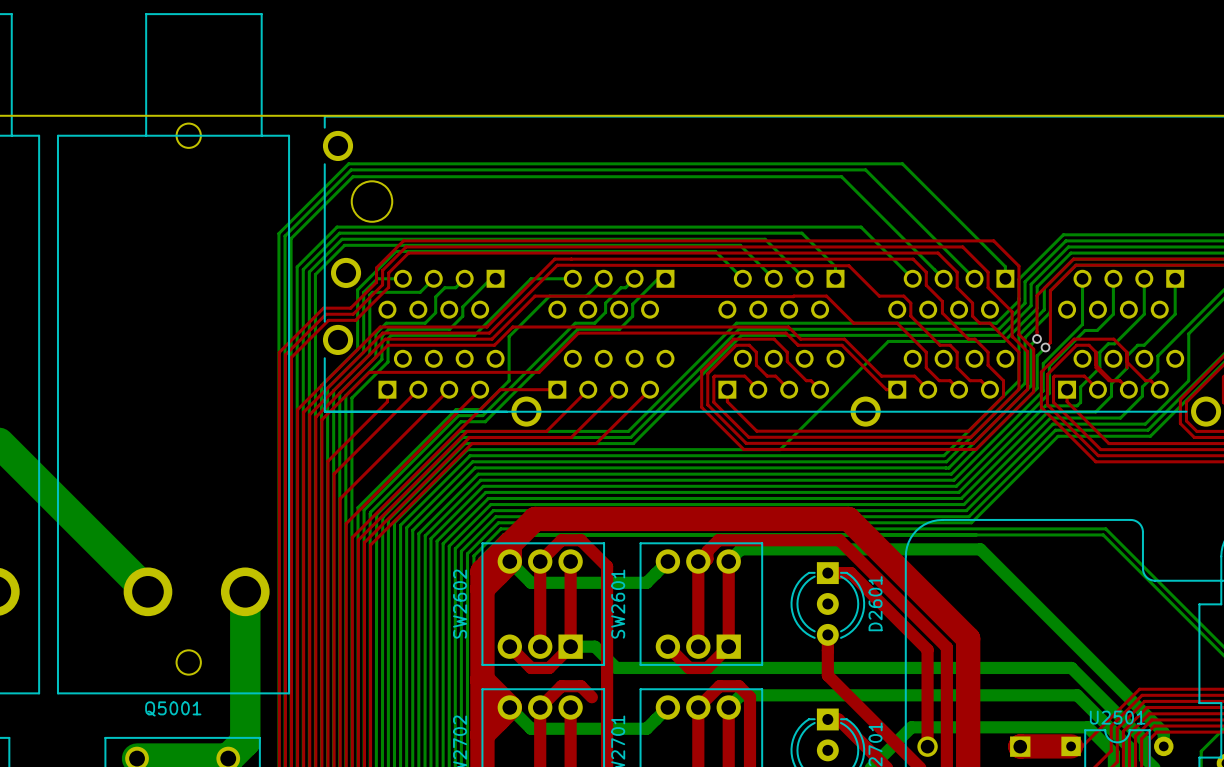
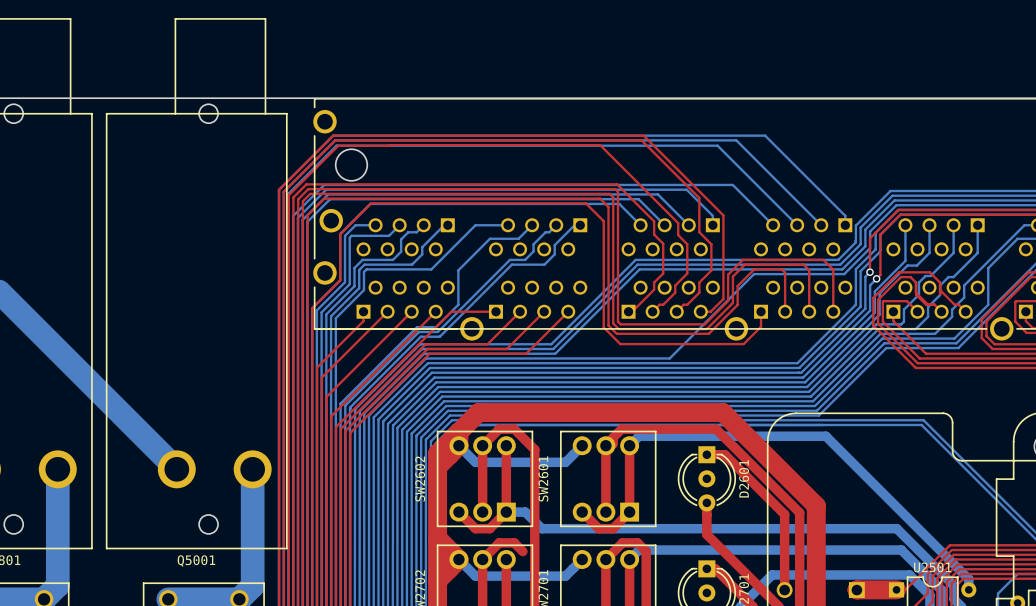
top track: (826, 296) (535, 296) (492, 339) (385, 339) (309, 414) -> (705, 238) (699, 232) (699, 198) (641, 140) (335, 140) (283, 191) (283, 284)
top track: (833, 303) (853, 323) (874, 323) -> (711, 244) (711, 270) (699, 282) (699, 292) (676, 311)
top track: none -> (742, 259) (728, 274) (728, 301) (704, 324) (620, 324)
top track: (897, 323) (926, 352) (926, 367) (939, 380) (950, 380) (959, 389) -> (760, 259) (823, 259) (833, 269) (833, 311)
top track: (279, 352) (323, 308) (350, 308) (376, 282) (376, 267) (403, 240) (993, 240) (1018, 266) (1018, 334) (1033, 349) (1033, 391) (976, 449) (743, 449) (712, 418) -> (279, 282) (279, 189) (333, 135) (643, 135) (723, 215) (723, 299) (710, 311) (700, 311)
top track: (285, 354) (326, 314) (353, 314) (382, 284) (382, 270) (406, 246) (962, 246) (988, 272) (988, 287) (1012, 311) (1012, 336) (1027, 351) (1027, 389) (973, 443) (746, 443) (714, 411) -> (809, 311) (809, 270) (803, 264) (744, 264) (732, 276) (732, 302) (706, 329) (618, 329)
top track: (787, 356) (787, 352) (774, 339) (733, 339) (701, 371) -> none
top track: (291, 357) (328, 320) (355, 320) (388, 287) (388, 272) (408, 253) (937, 253) (957, 272) (957, 287) (972, 303) (972, 316) (979, 323) (989, 323) (1018, 352) (1018, 389) (971, 437) (748, 437) (717, 405) -> (288, 286) (288, 195) (338, 145) (389, 145) (600, 145) (678, 223) (678, 235) (687, 244) (687, 273) (675, 285)
top track: (787, 361) (806, 380) (811, 380) (820, 389) -> (675, 289) (675, 292) (663, 304) (659, 304) (652, 311)
top track: (707, 373) (736, 345) (749, 345) (756, 352) (756, 365) (767, 376) (775, 376) (789, 389) -> (613, 299) (613, 197) (609, 193) (310, 193) (302, 201) (302, 331)
top track: (713, 377) (744, 376) (758, 389) -> none
top track: (727, 389) (727, 401) (756, 431) -> none
top track: (897, 389) (886, 389) (842, 345) (798, 345) (785, 333) (578, 333) (539, 372) (369, 372) (321, 419) -> (651, 344) (620, 344) (603, 327) (603, 221) (585, 203) (371, 203) (340, 234) (340, 280) (312, 308) (312, 335)
top track: none -> (761, 311) (761, 326) (743, 344)
top track: (928, 389) (914, 376) (881, 376) (844, 339) (800, 339) (788, 327) (512, 327) (494, 345) (387, 345) (315, 417) -> (608, 297) (608, 207) (600, 198) (324, 198) (307, 215) (307, 333)
top track: none -> (785, 311) (785, 272) (781, 269) (754, 269) (737, 286) (737, 304) (708, 333) (616, 333)
top track: (989, 389) (980, 380) (970, 380) (957, 367) (957, 352) (950, 345) (939, 345) (910, 316) (910, 303) (903, 296) (879, 296) (848, 265) (557, 265) (489, 333) (382, 333) (303, 412) -> (617, 301) (617, 191) (615, 189) (308, 189) (298, 199) (298, 329)
top track: (297, 409) (380, 327) (486, 327) (554, 259) (913, 259) (926, 272) (926, 285) (942, 301) (942, 313) (968, 339) (974, 339) (988, 352) (988, 365) (1003, 380) (1003, 396) (968, 431) (875, 431) -> (293, 327) (293, 197) (306, 184) (617, 184) (654, 221) (654, 234) (663, 243) (663, 273) (654, 282) (654, 289) (632, 311) (628, 311)

